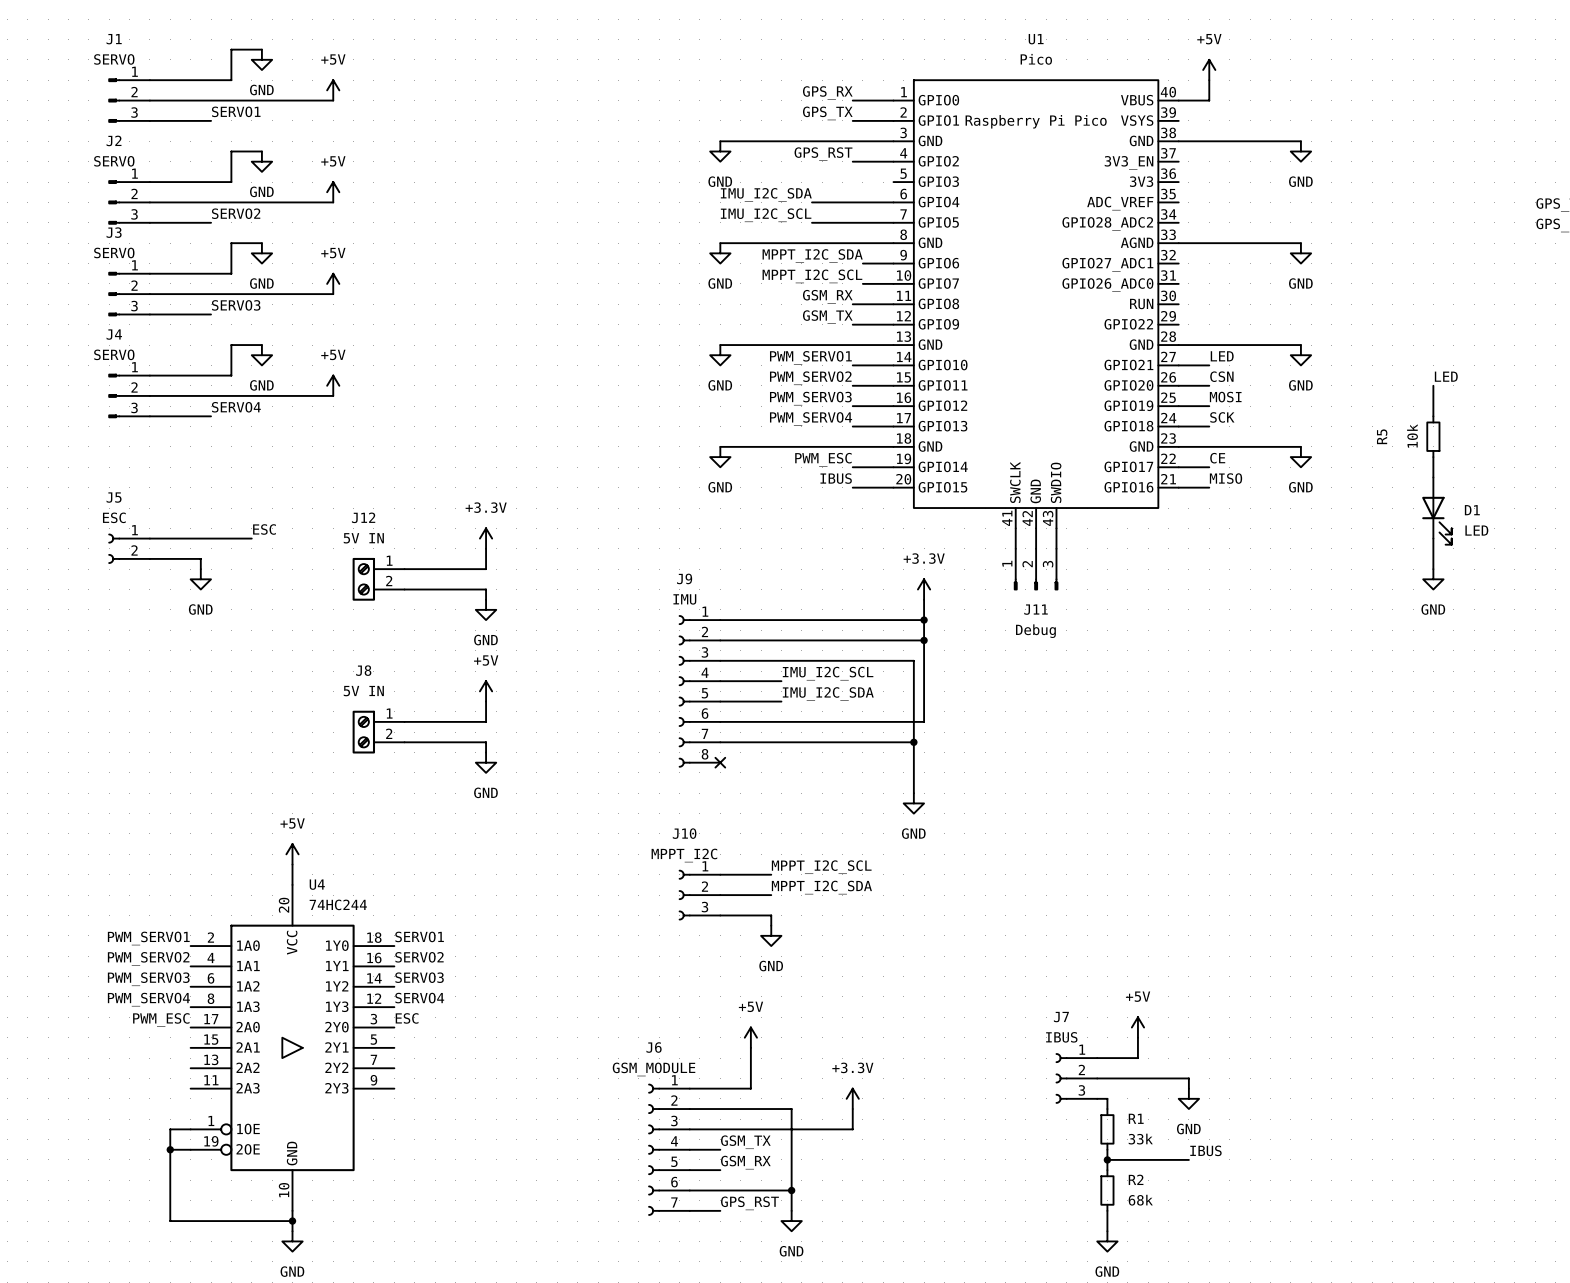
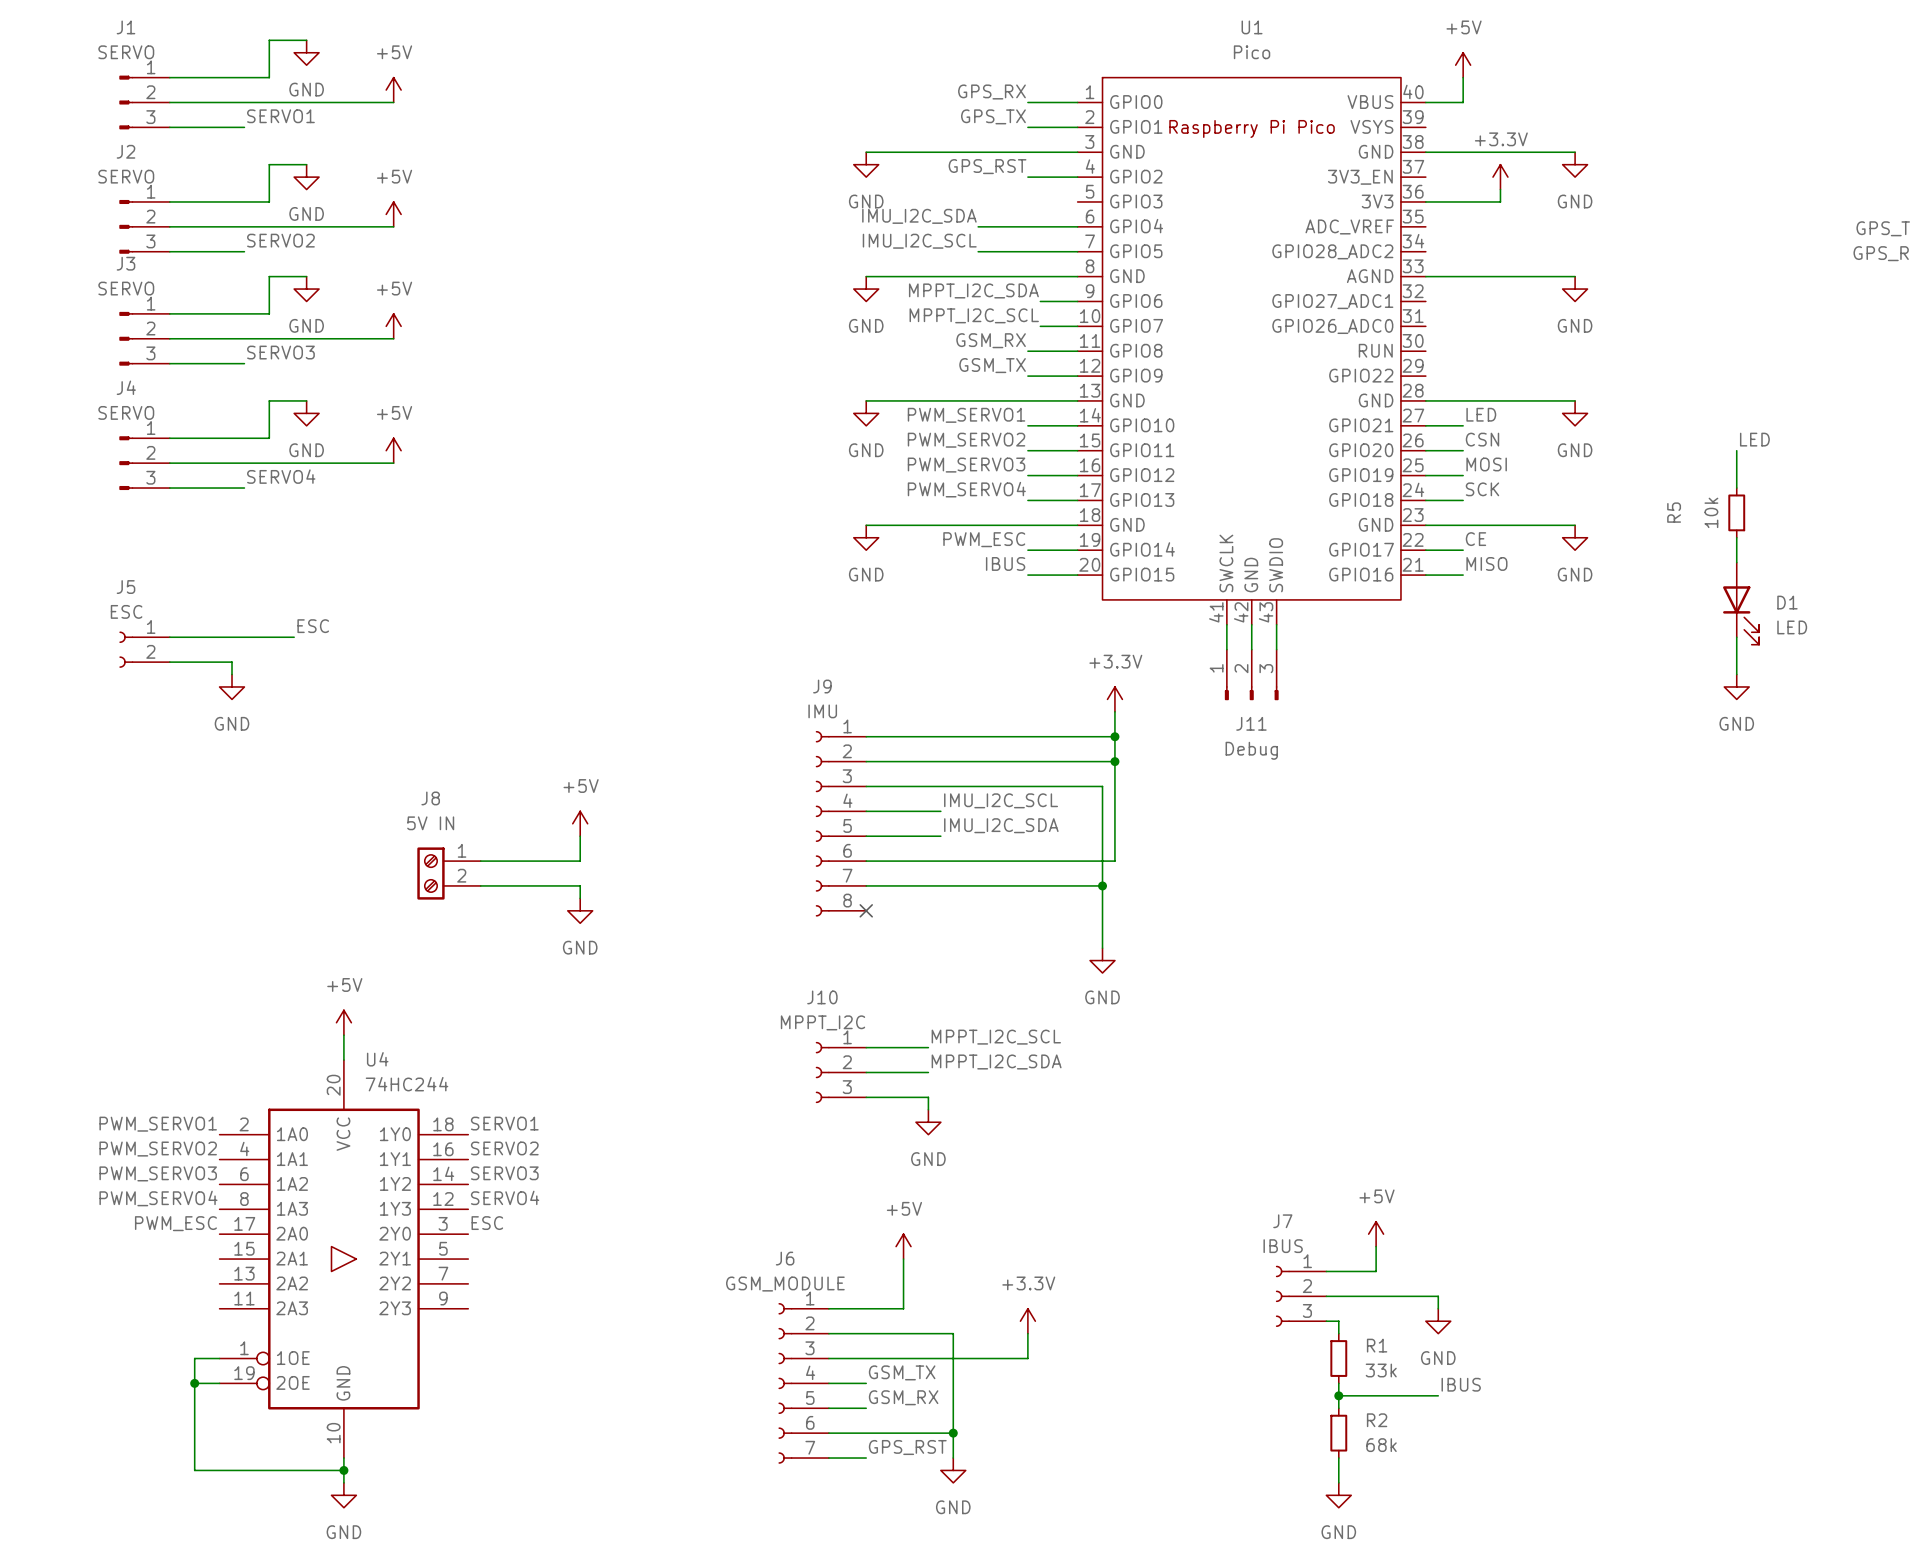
power symbol: none -> +3.3V (1500, 177)
wire: none -> (1500, 189) (1500, 201) (1425, 201)
power symbol: +3.3V (486, 538) -> none
wire: (486, 548) (486, 569) (404, 569) -> none
J12: 5V IN (378, 579) -> none
wire: (404, 589) (486, 589) (486, 599) -> none
power symbol: GND (486, 609) -> none

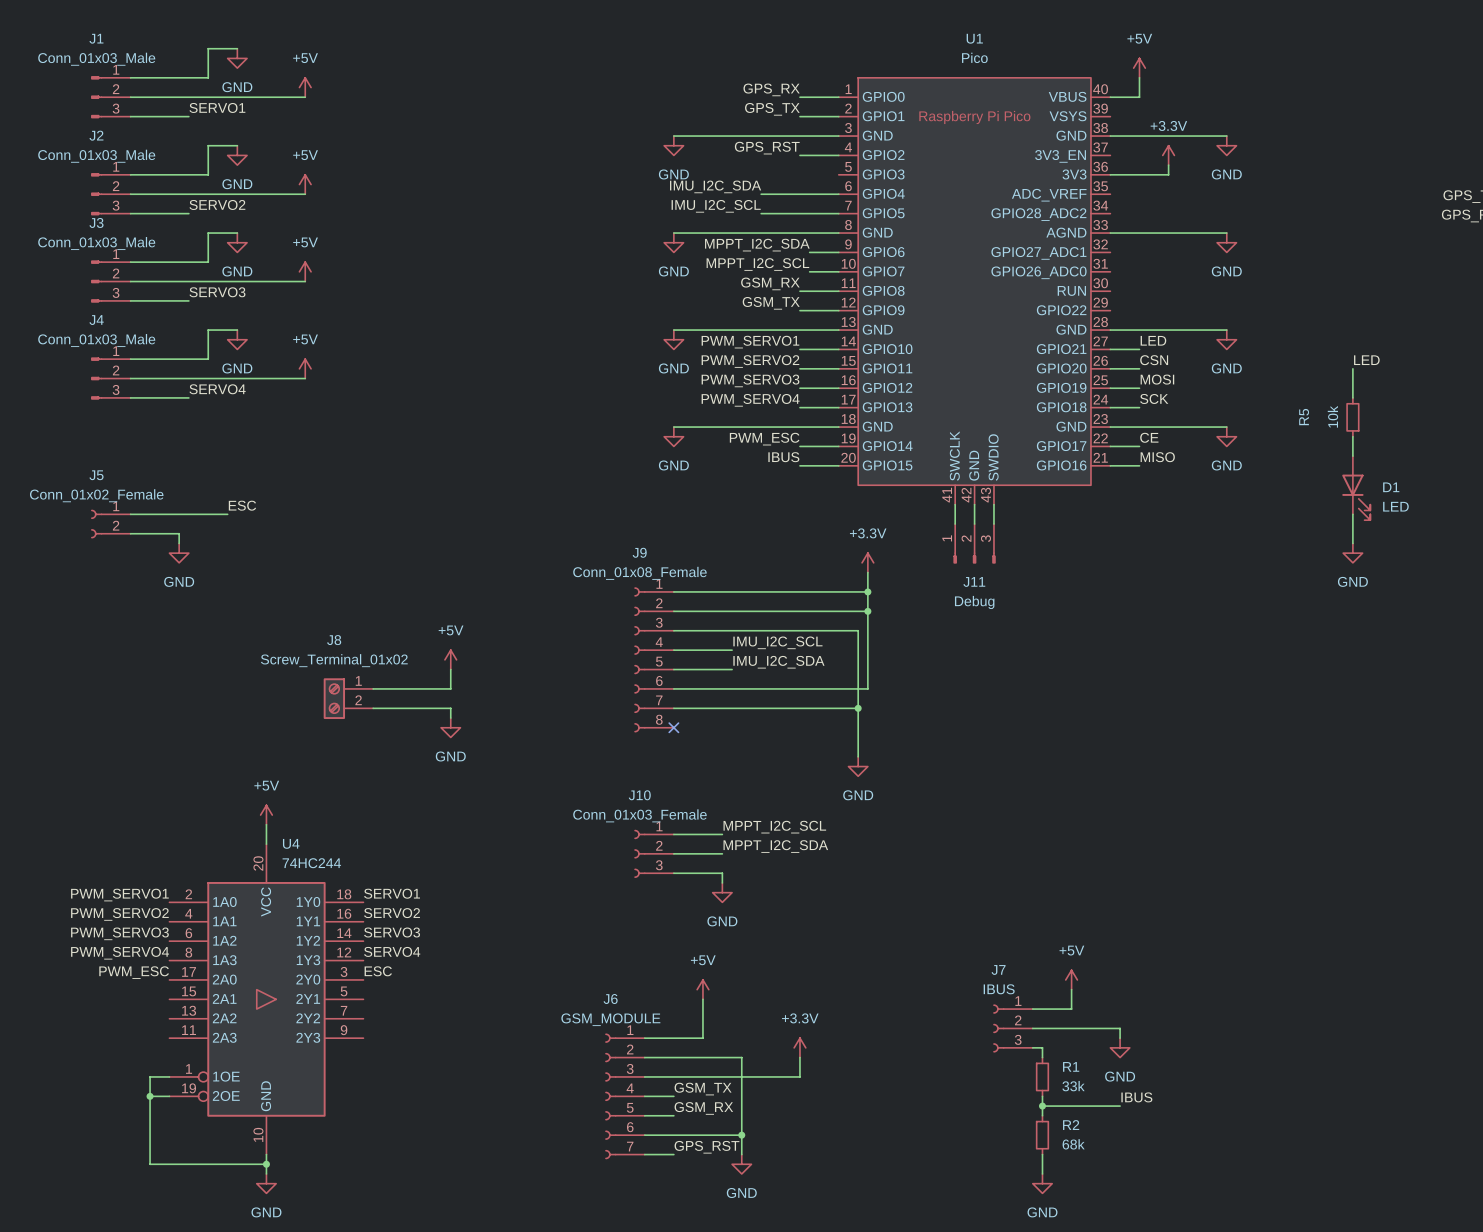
J1 value: SERVO (126, 52) -> Conn_01x03_Male (96, 59)
J2 value: SERVO (126, 176) -> Conn_01x03_Male (96, 156)
J3 value: SERVO (126, 288) -> Conn_01x03_Male (96, 243)
J4 value: SERVO (126, 412) -> Conn_01x03_Male (96, 340)
J5 value: ESC (126, 611) -> Conn_01x02_Female (96, 495)
J9 value: IMU (822, 711) -> Conn_01x08_Female (639, 573)
J8 value: 5V IN (430, 823) -> Screw_Terminal_01x02 (334, 660)
J10 value: MPPT_I2C (823, 1022) -> Conn_01x03_Female (639, 815)

